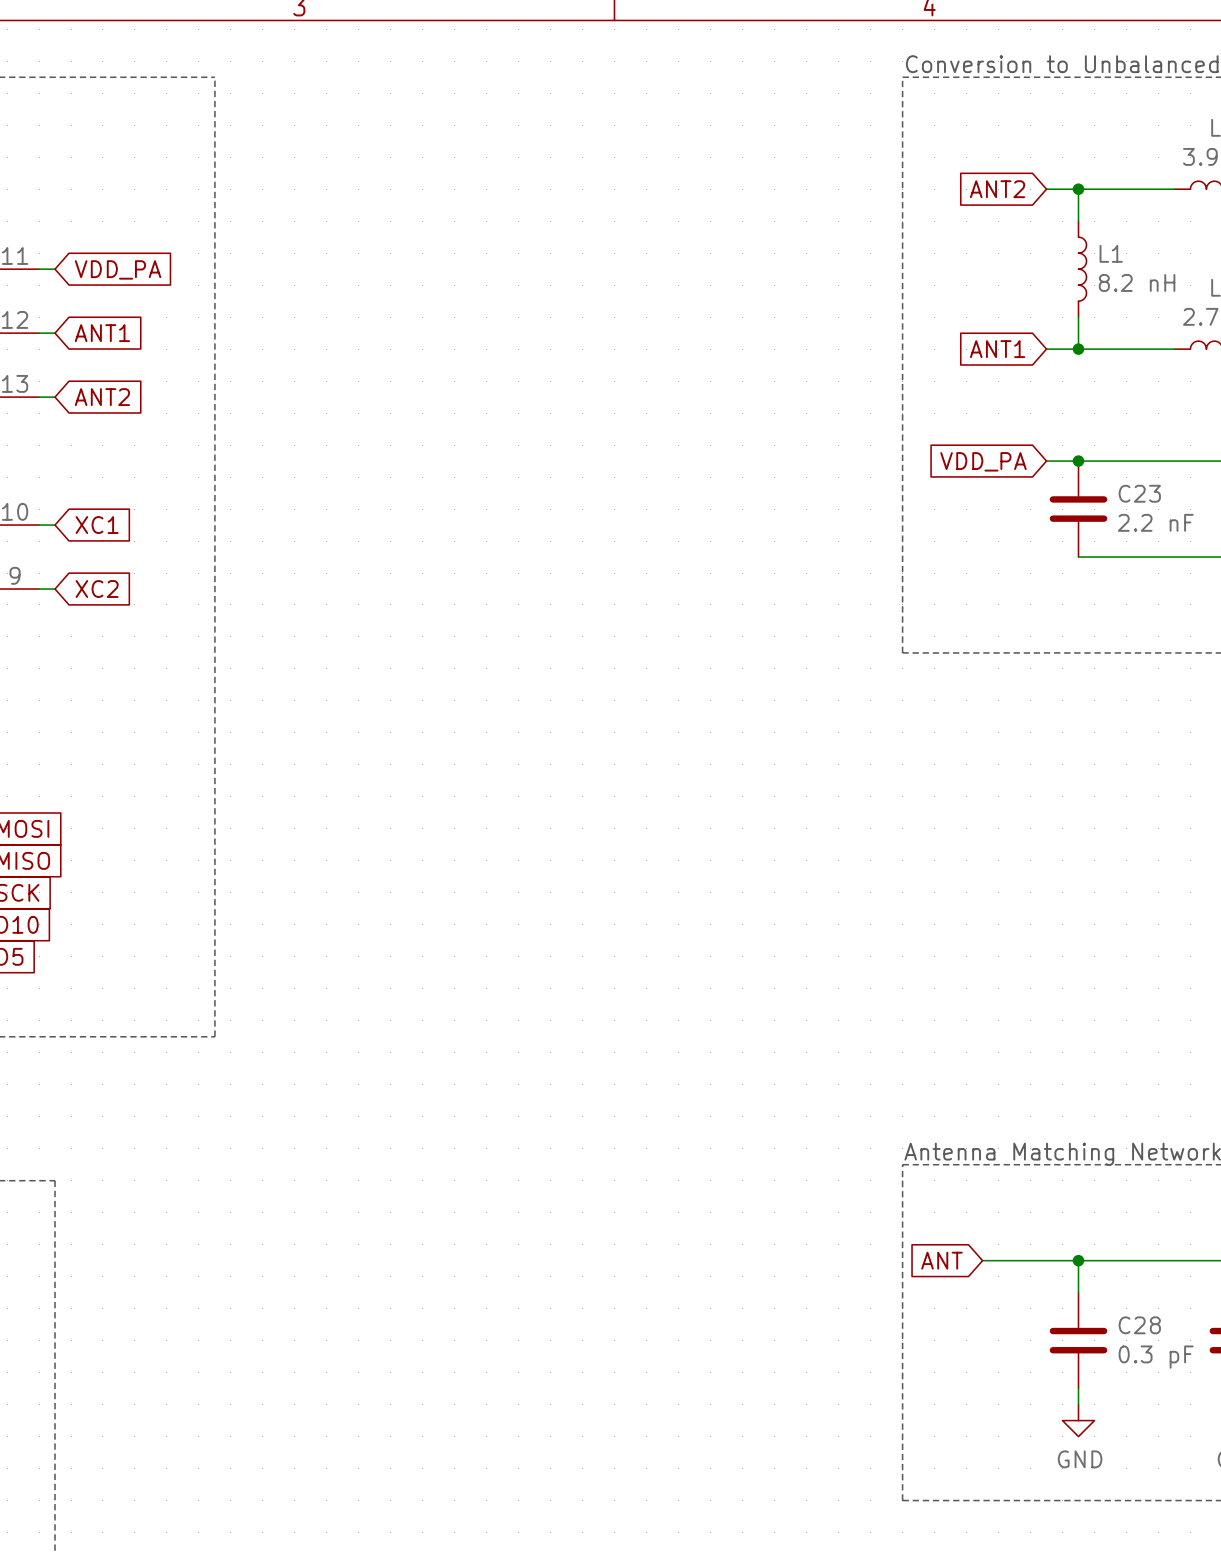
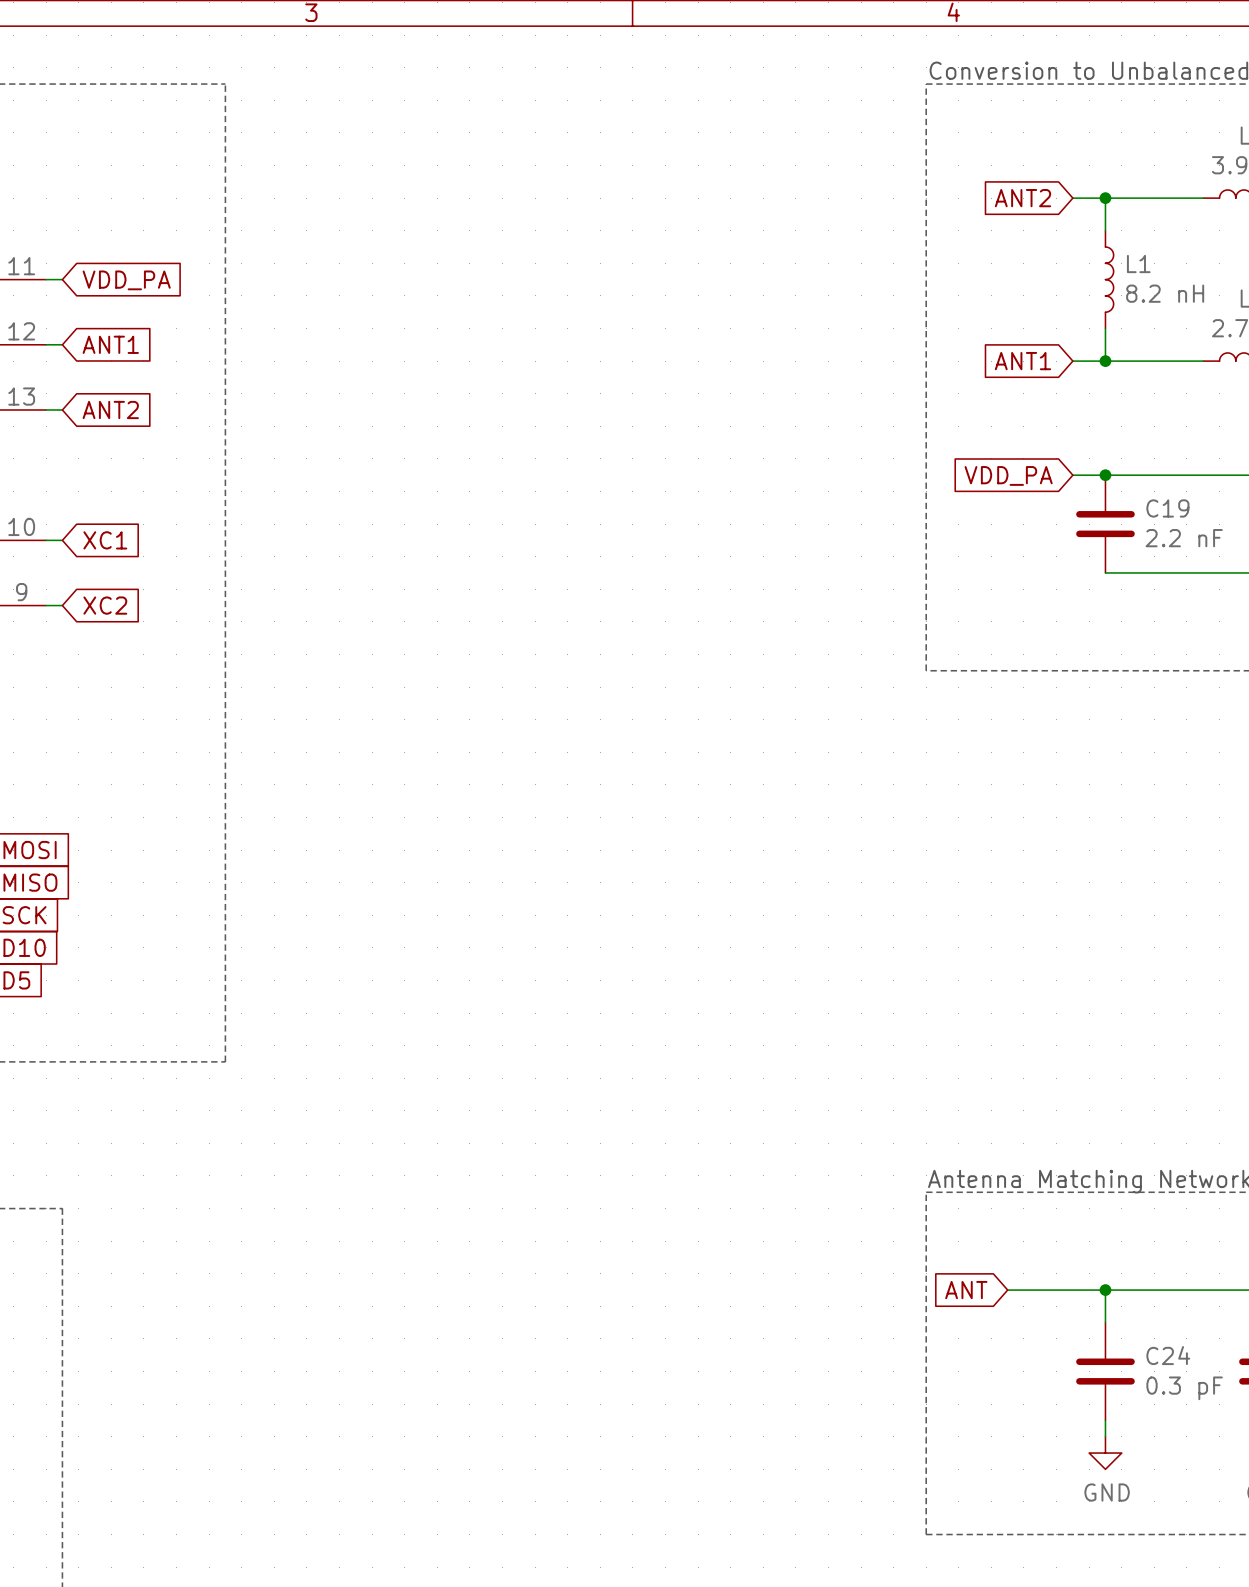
C23 name: C23 (1139, 493) -> C19 (1167, 508)
C28 name: C28 (1139, 1325) -> C24 (1168, 1355)

